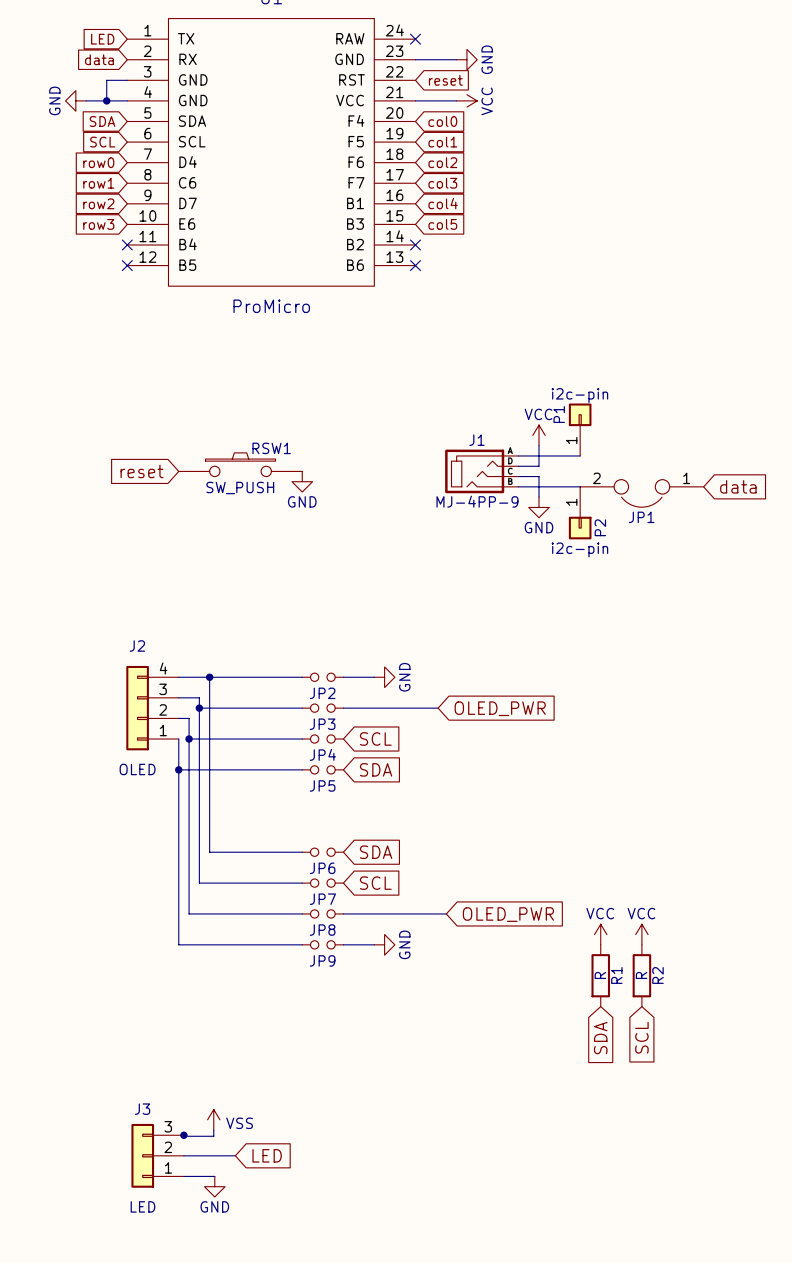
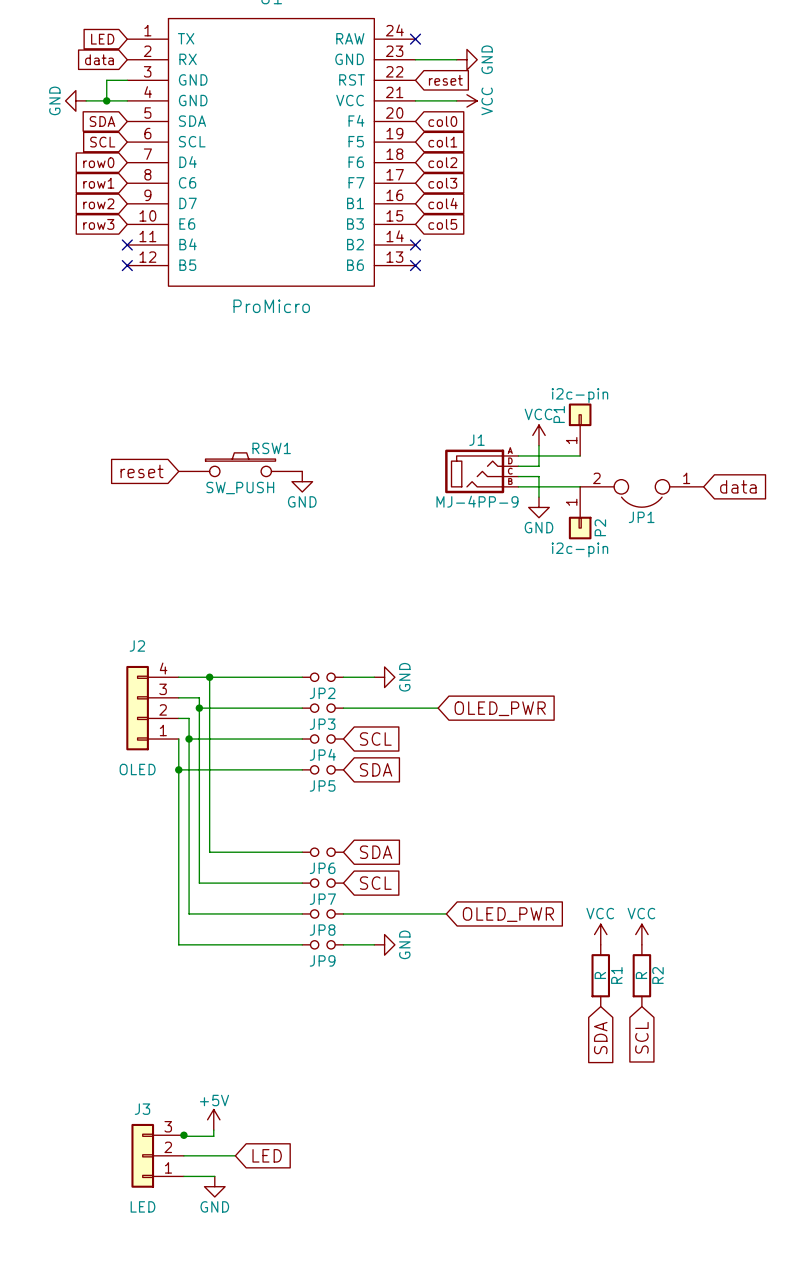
power symbol: VSS (213, 1119) -> +5V (213, 1119)

